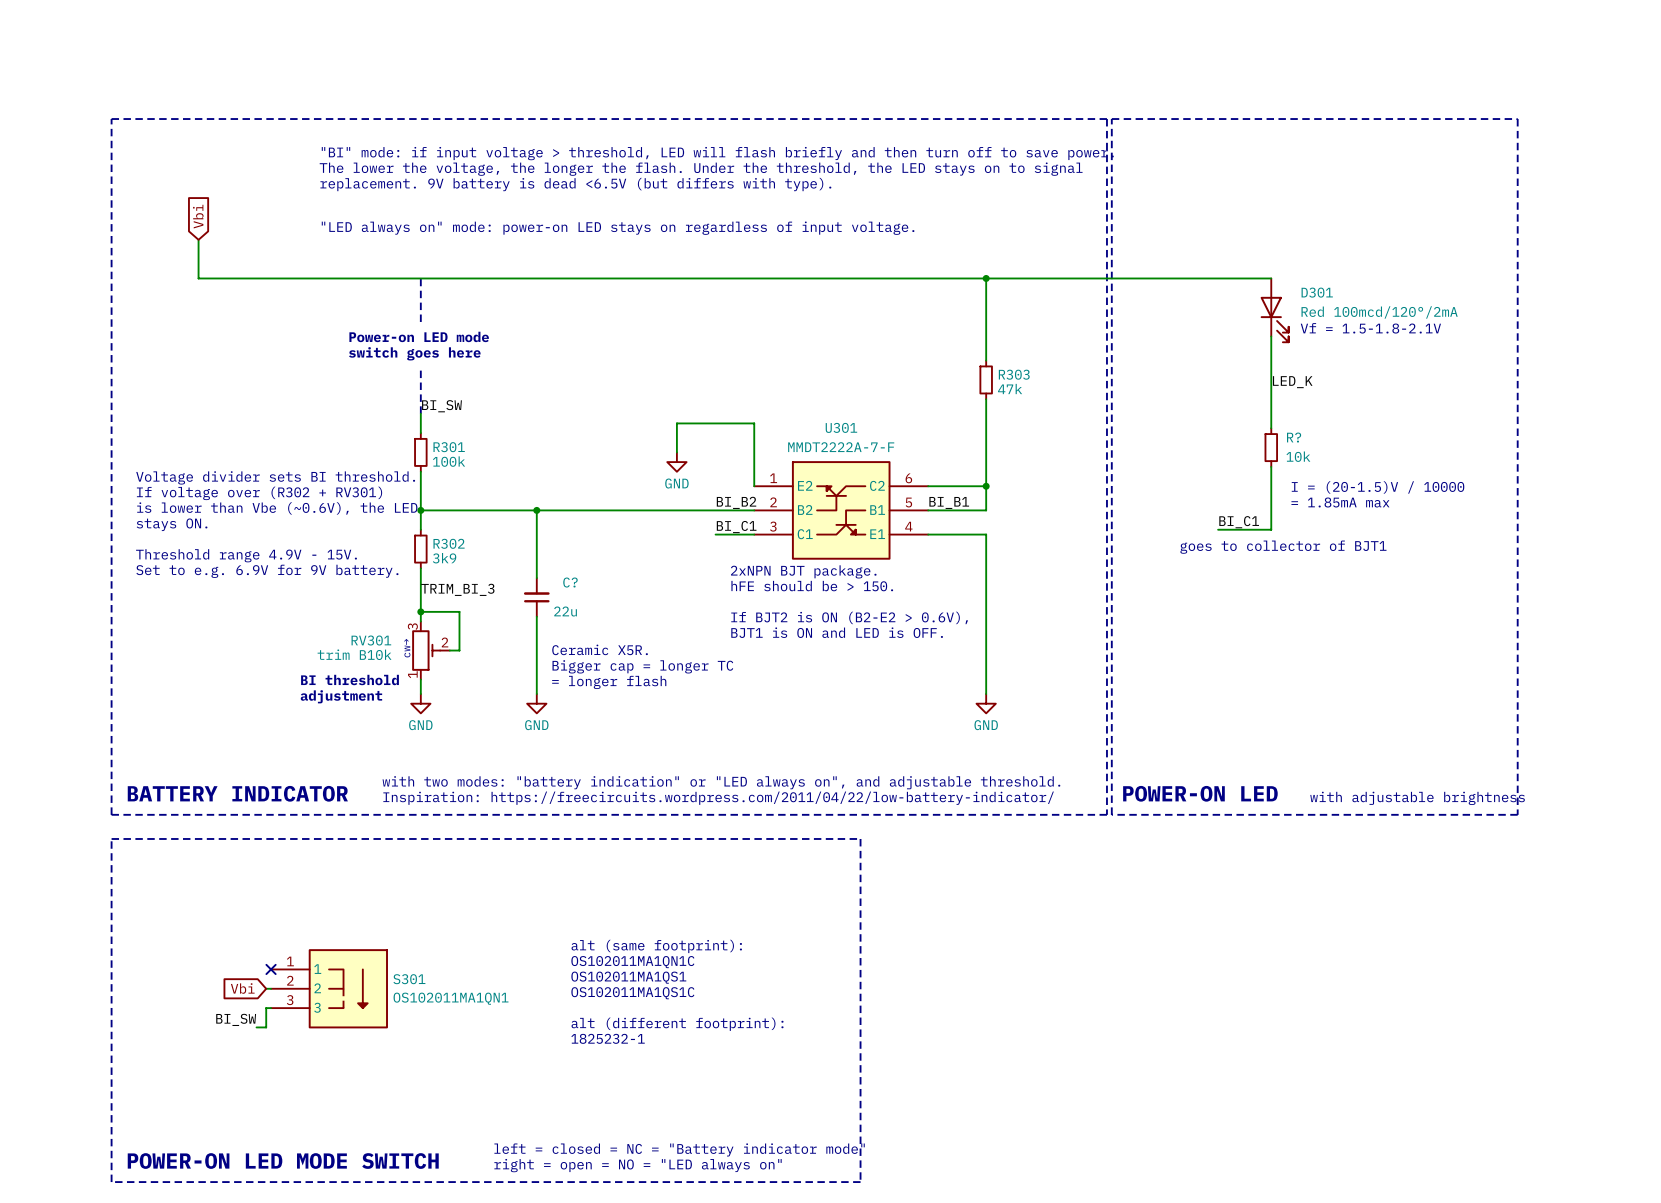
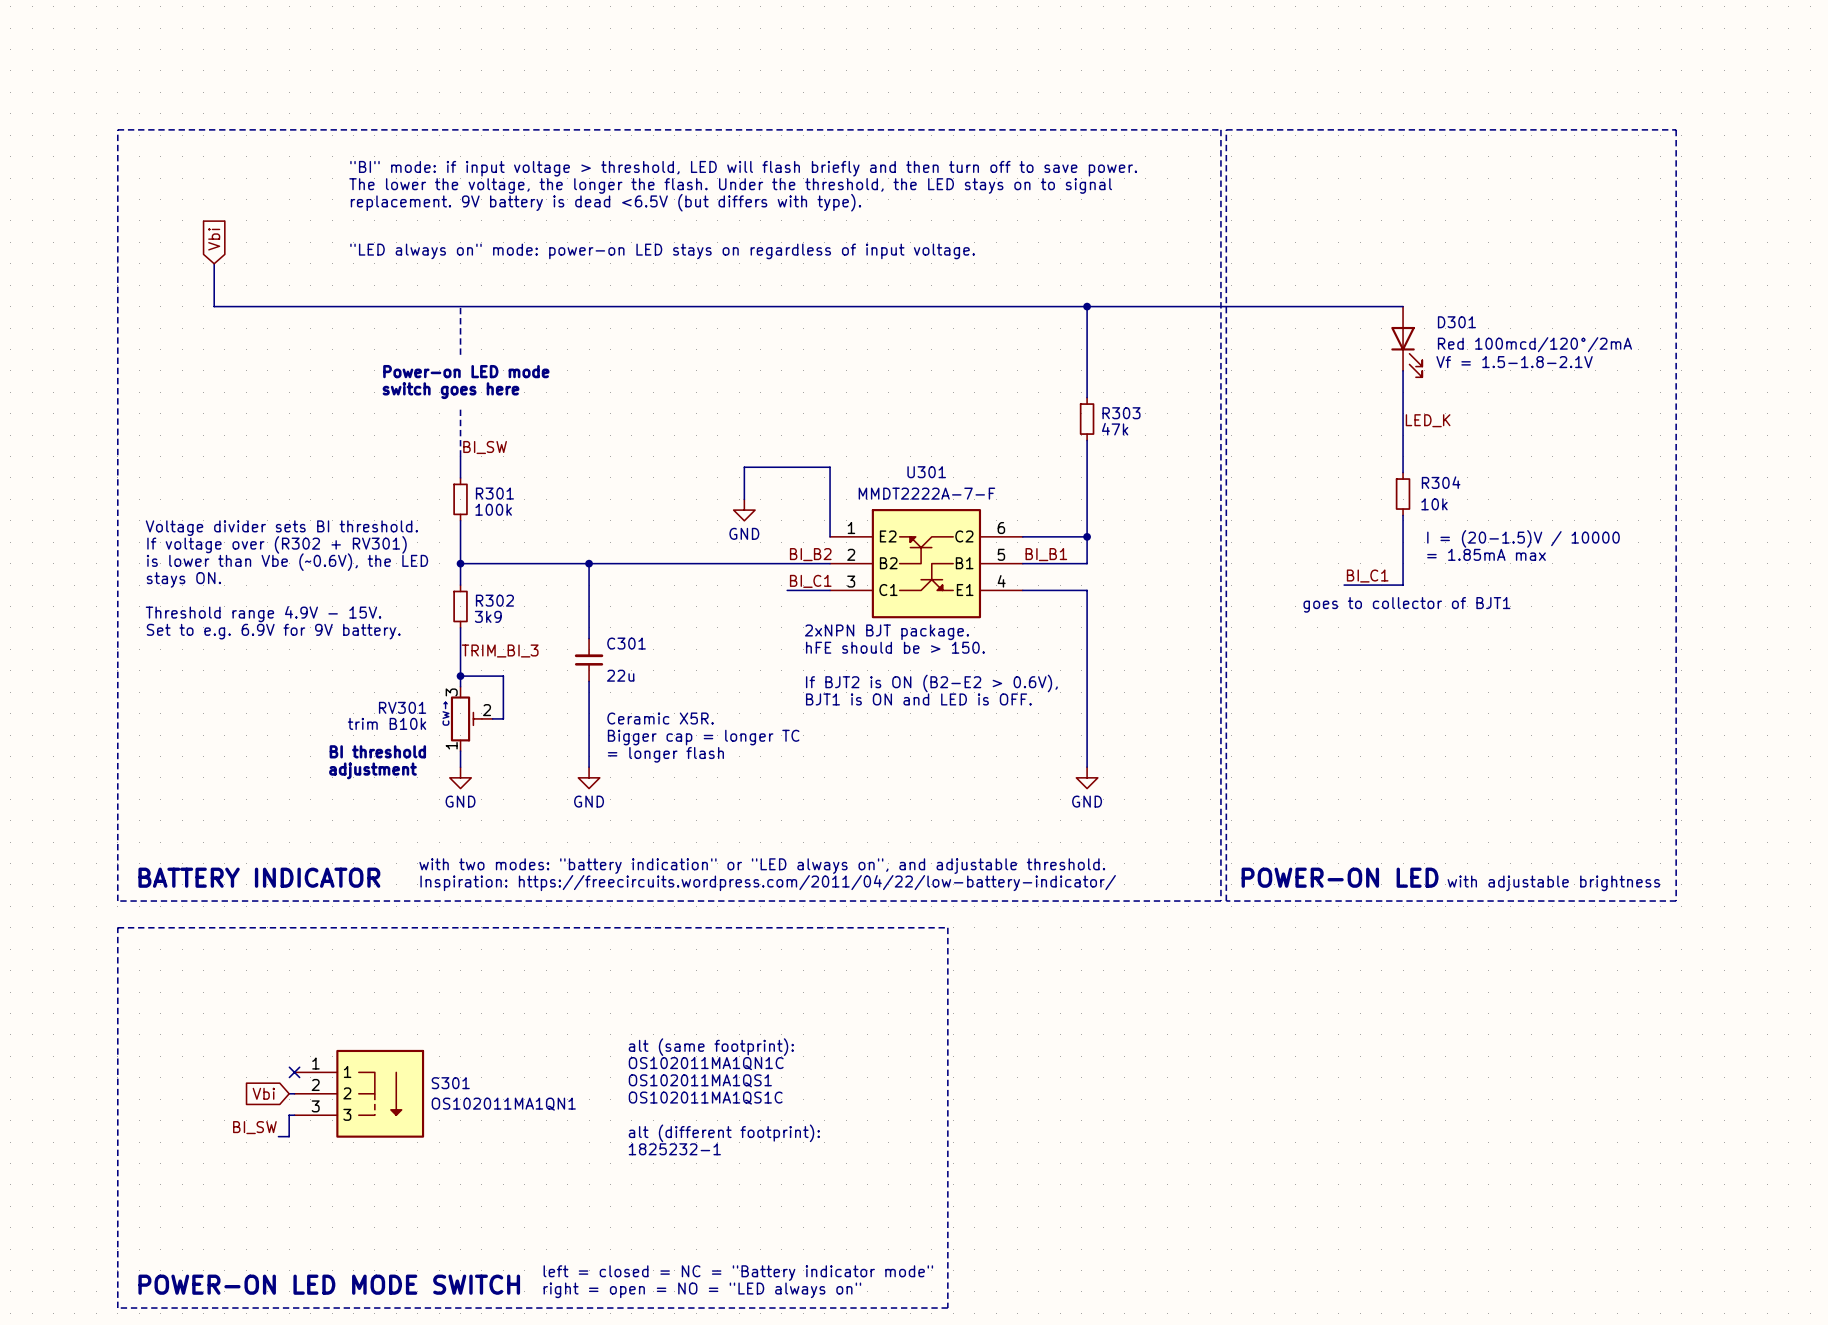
R? name: R? (1294, 437) -> R304 (1441, 482)
C? name: C? (570, 582) -> C301 (626, 643)

